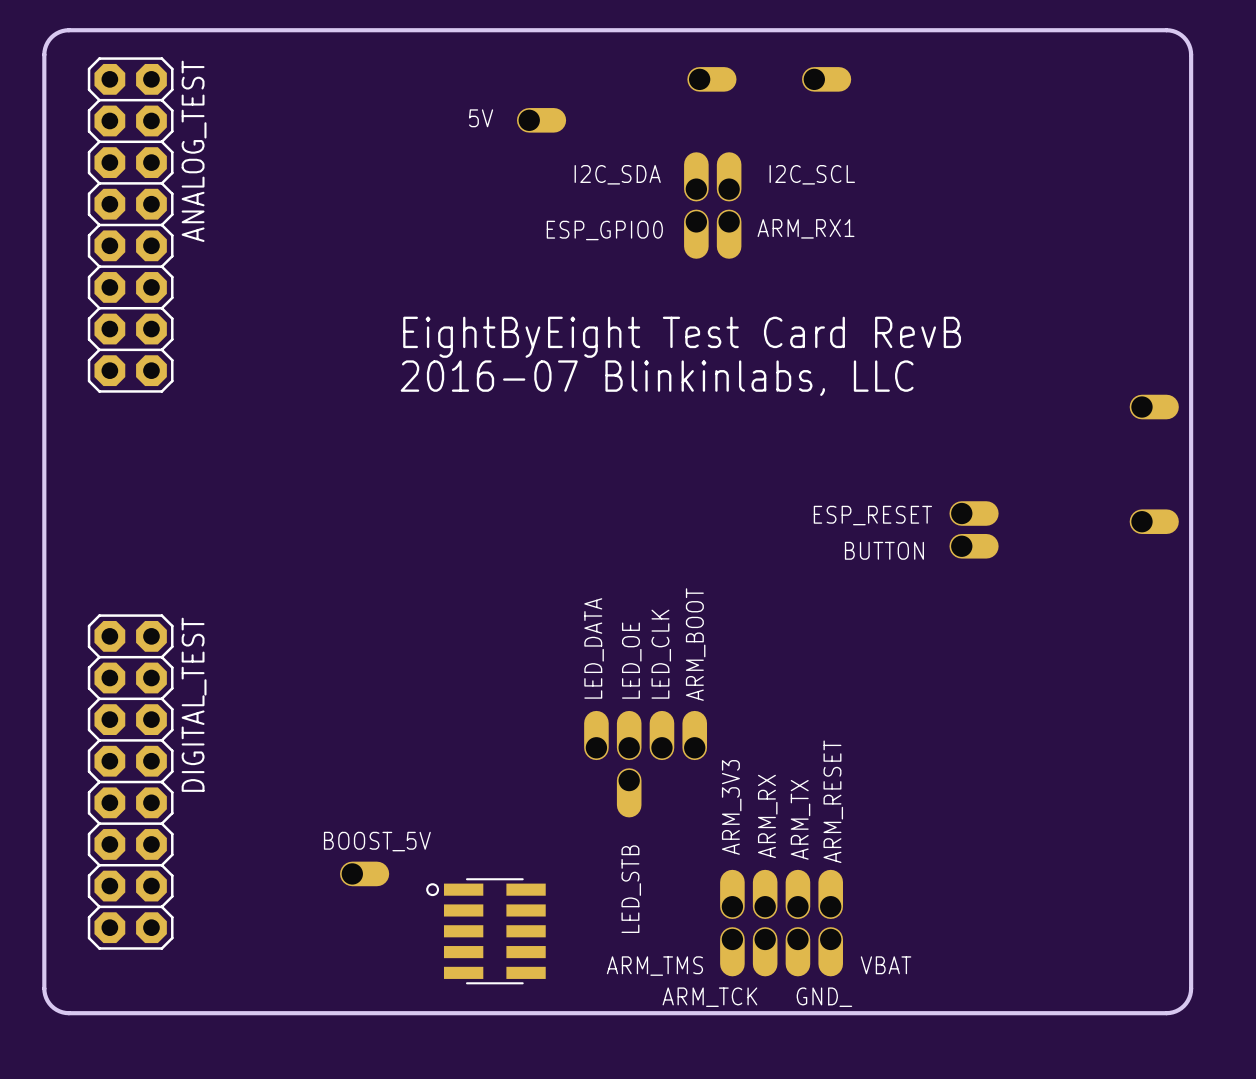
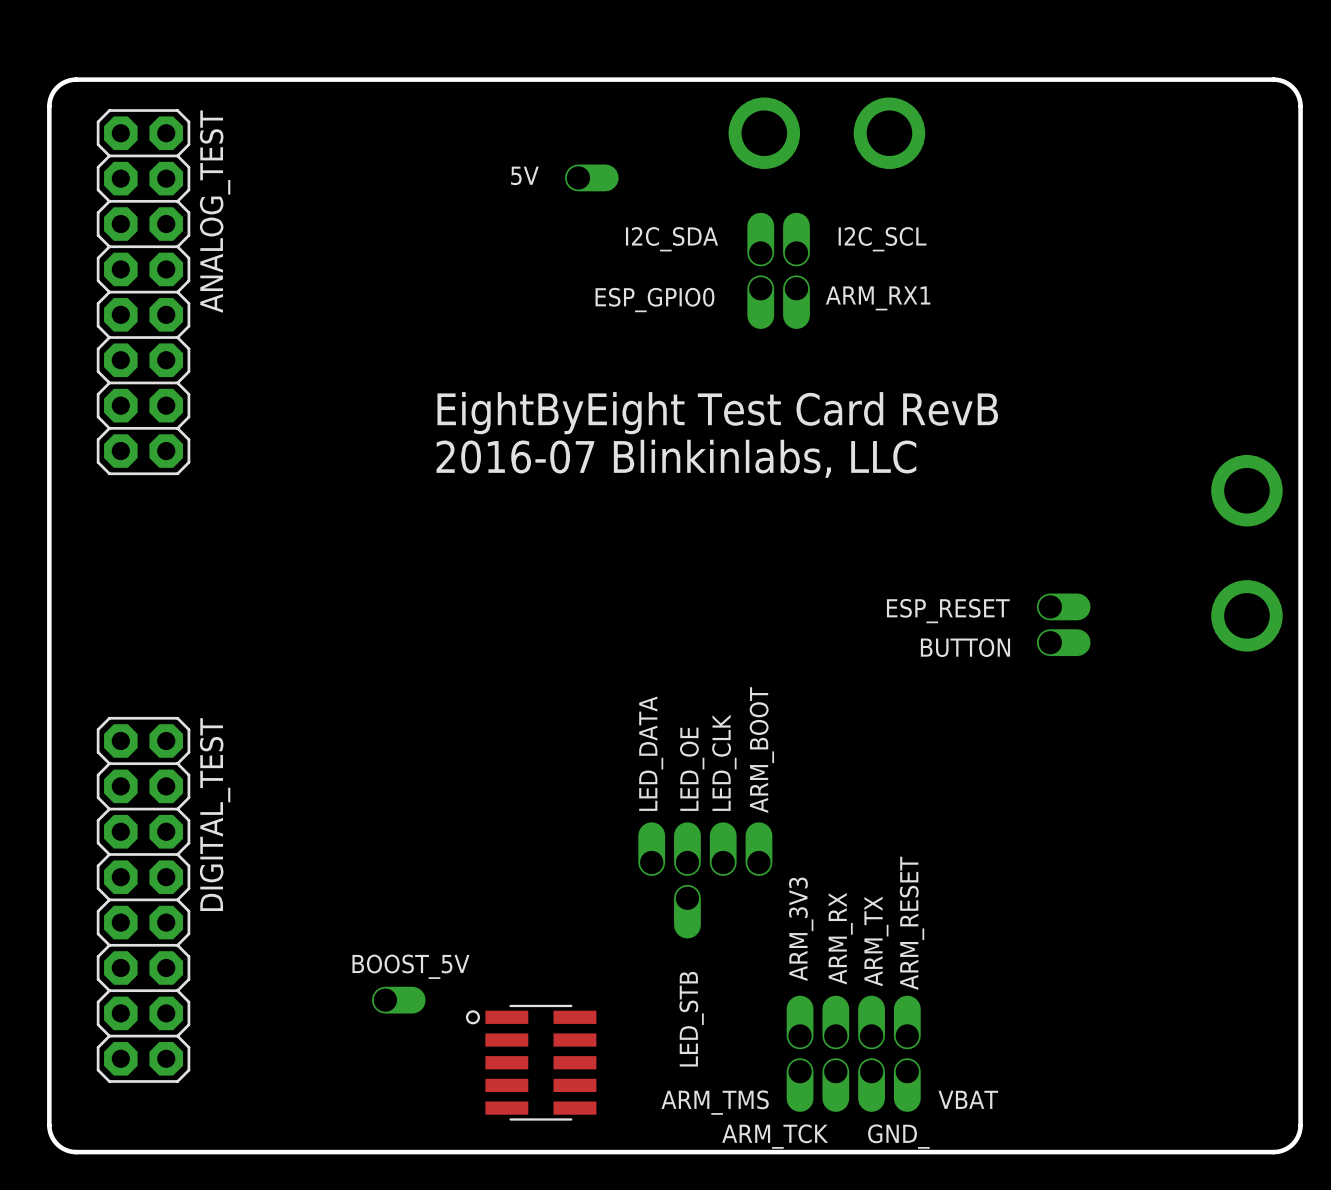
part footprint: [687, 67, 737, 92] -> [728, 97, 801, 169]
part footprint: [802, 67, 852, 92] -> [853, 97, 926, 169]
part footprint: [1129, 394, 1179, 420] -> [1211, 454, 1283, 527]
part footprint: [1129, 509, 1179, 534] -> [1211, 580, 1283, 652]

